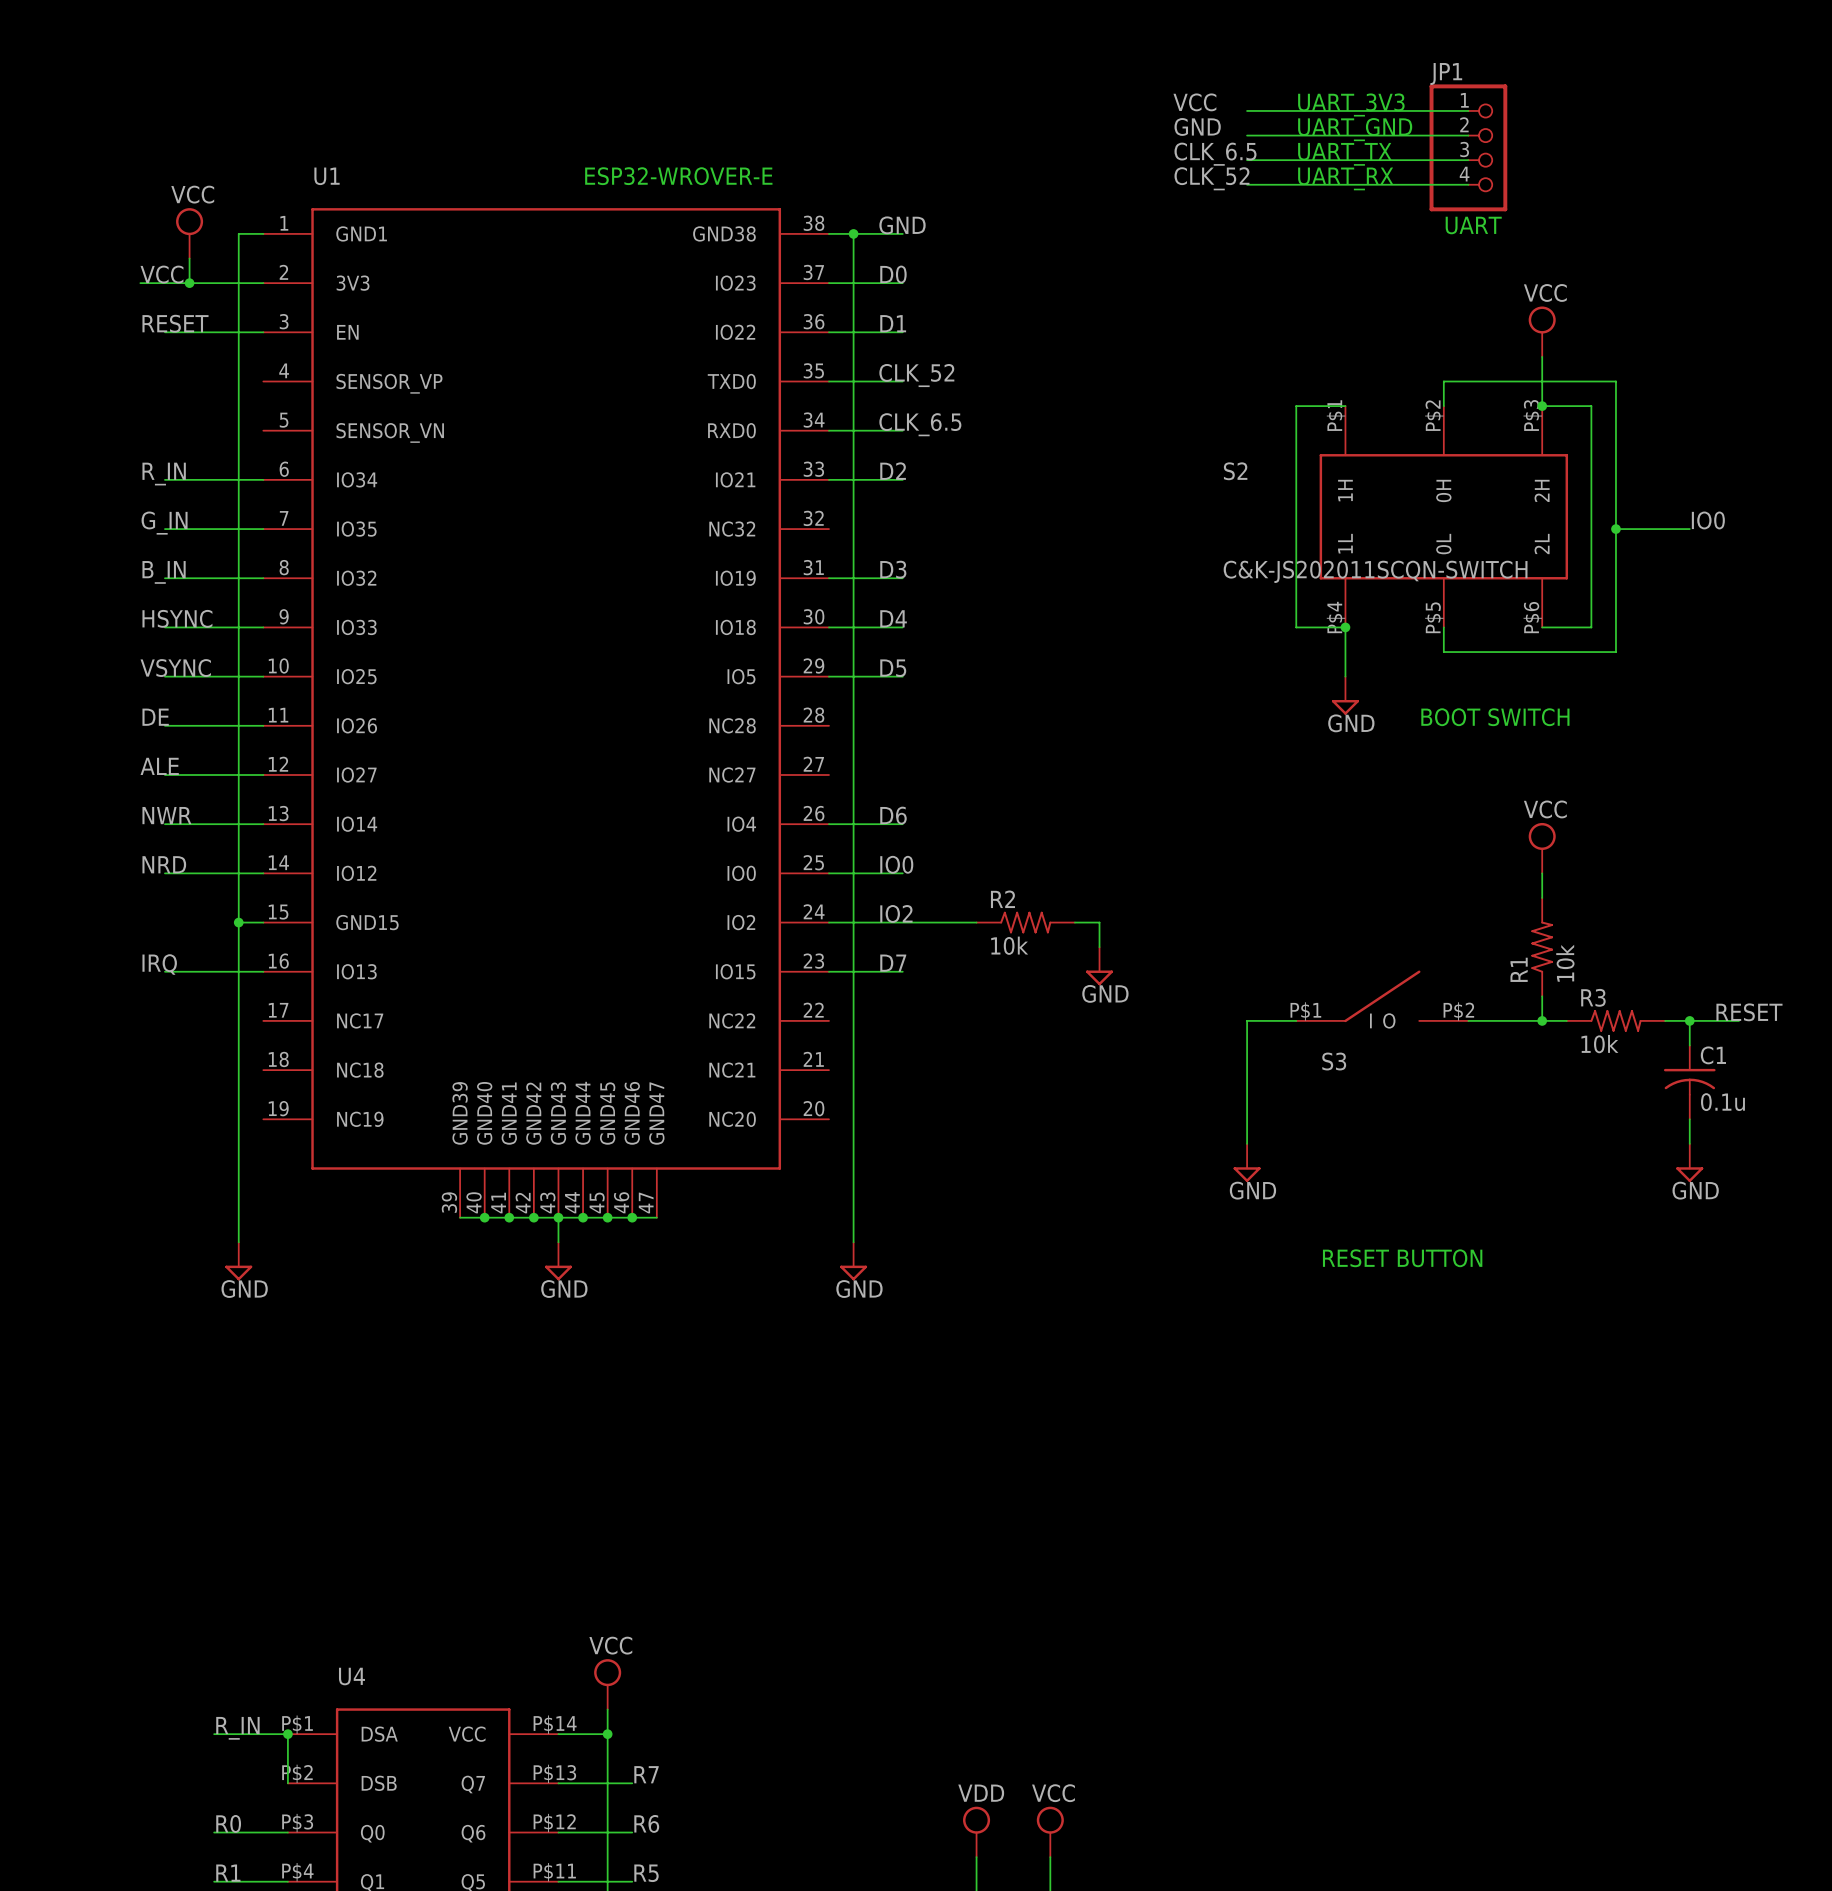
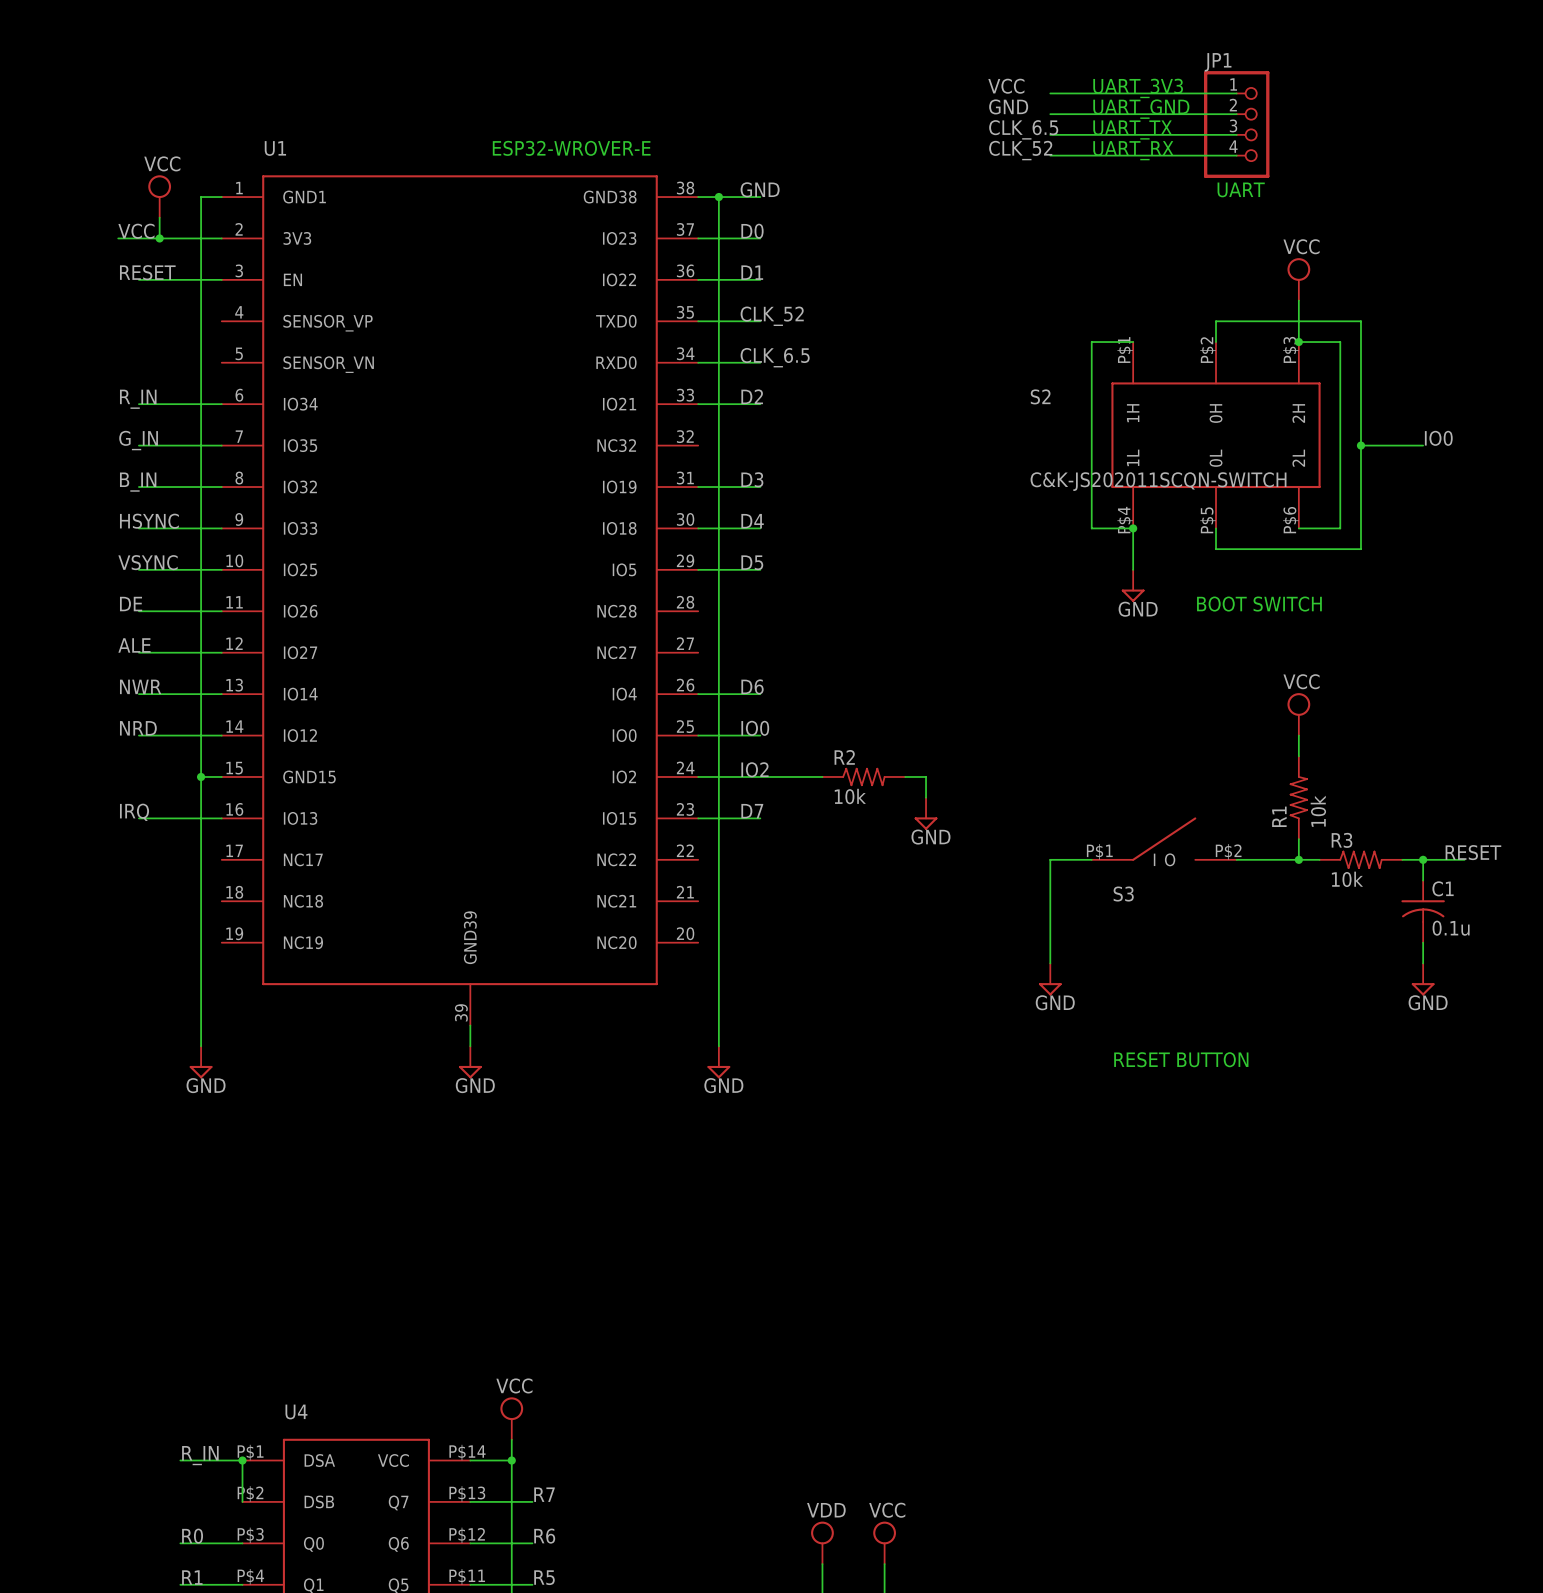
U1 symbol: [263, 208, 829, 1218] -> [221, 175, 699, 1026]
wire: (460, 1217) (656, 1217) -> none
junction: (484, 1217) -> none
junction: (509, 1217) -> none
junction: (533, 1217) -> none
junction: (558, 1217) -> none
junction: (583, 1217) -> none
junction: (607, 1217) -> none
junction: (632, 1217) -> none

